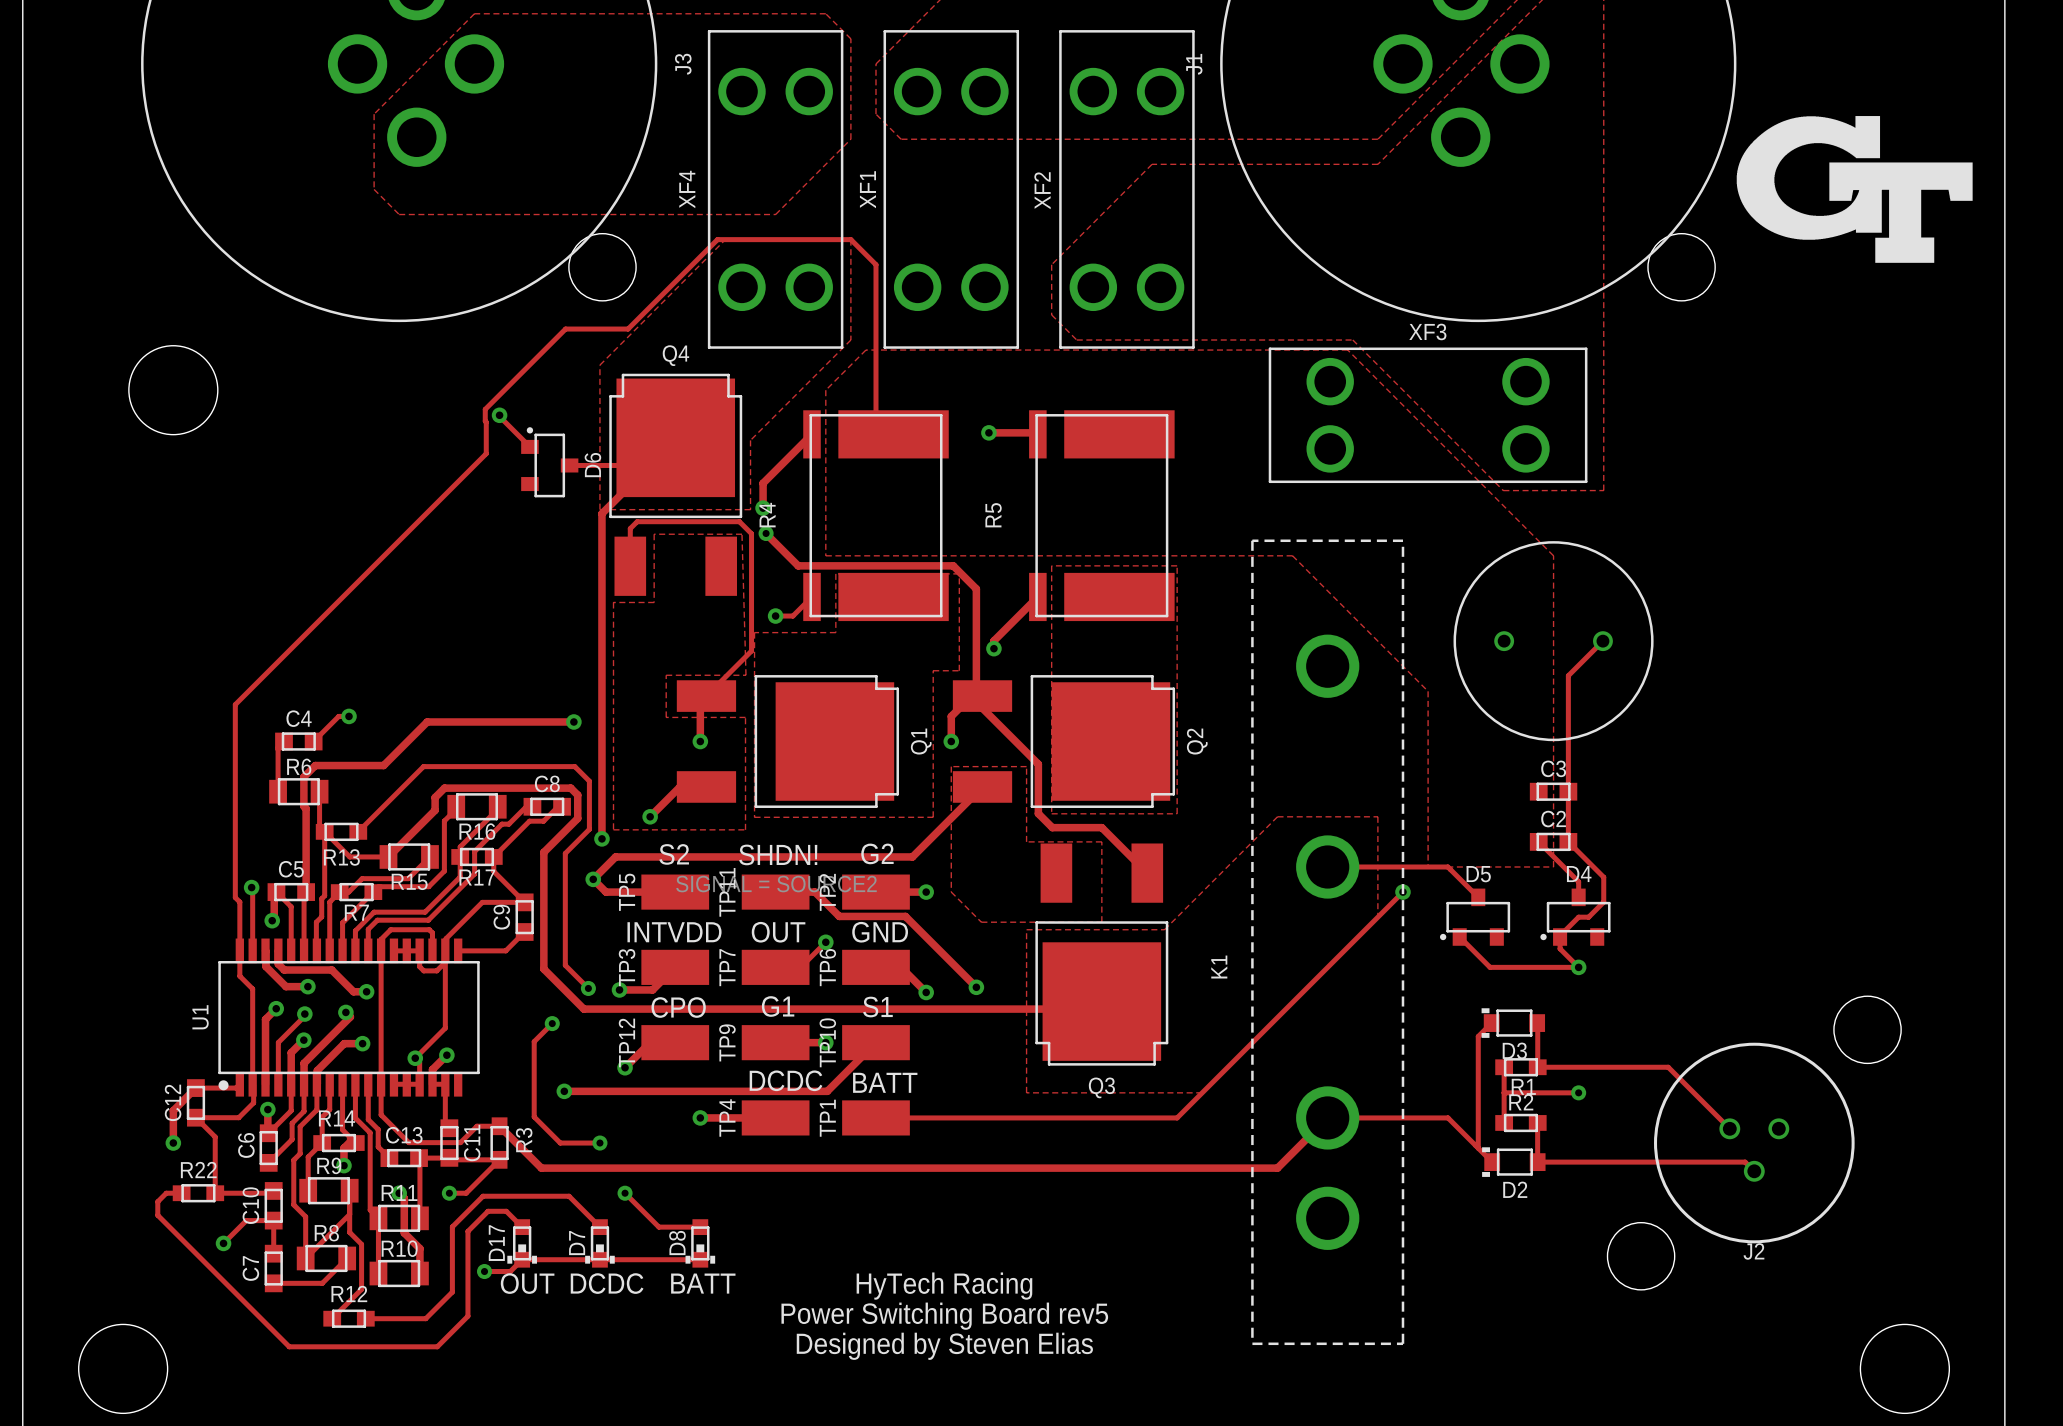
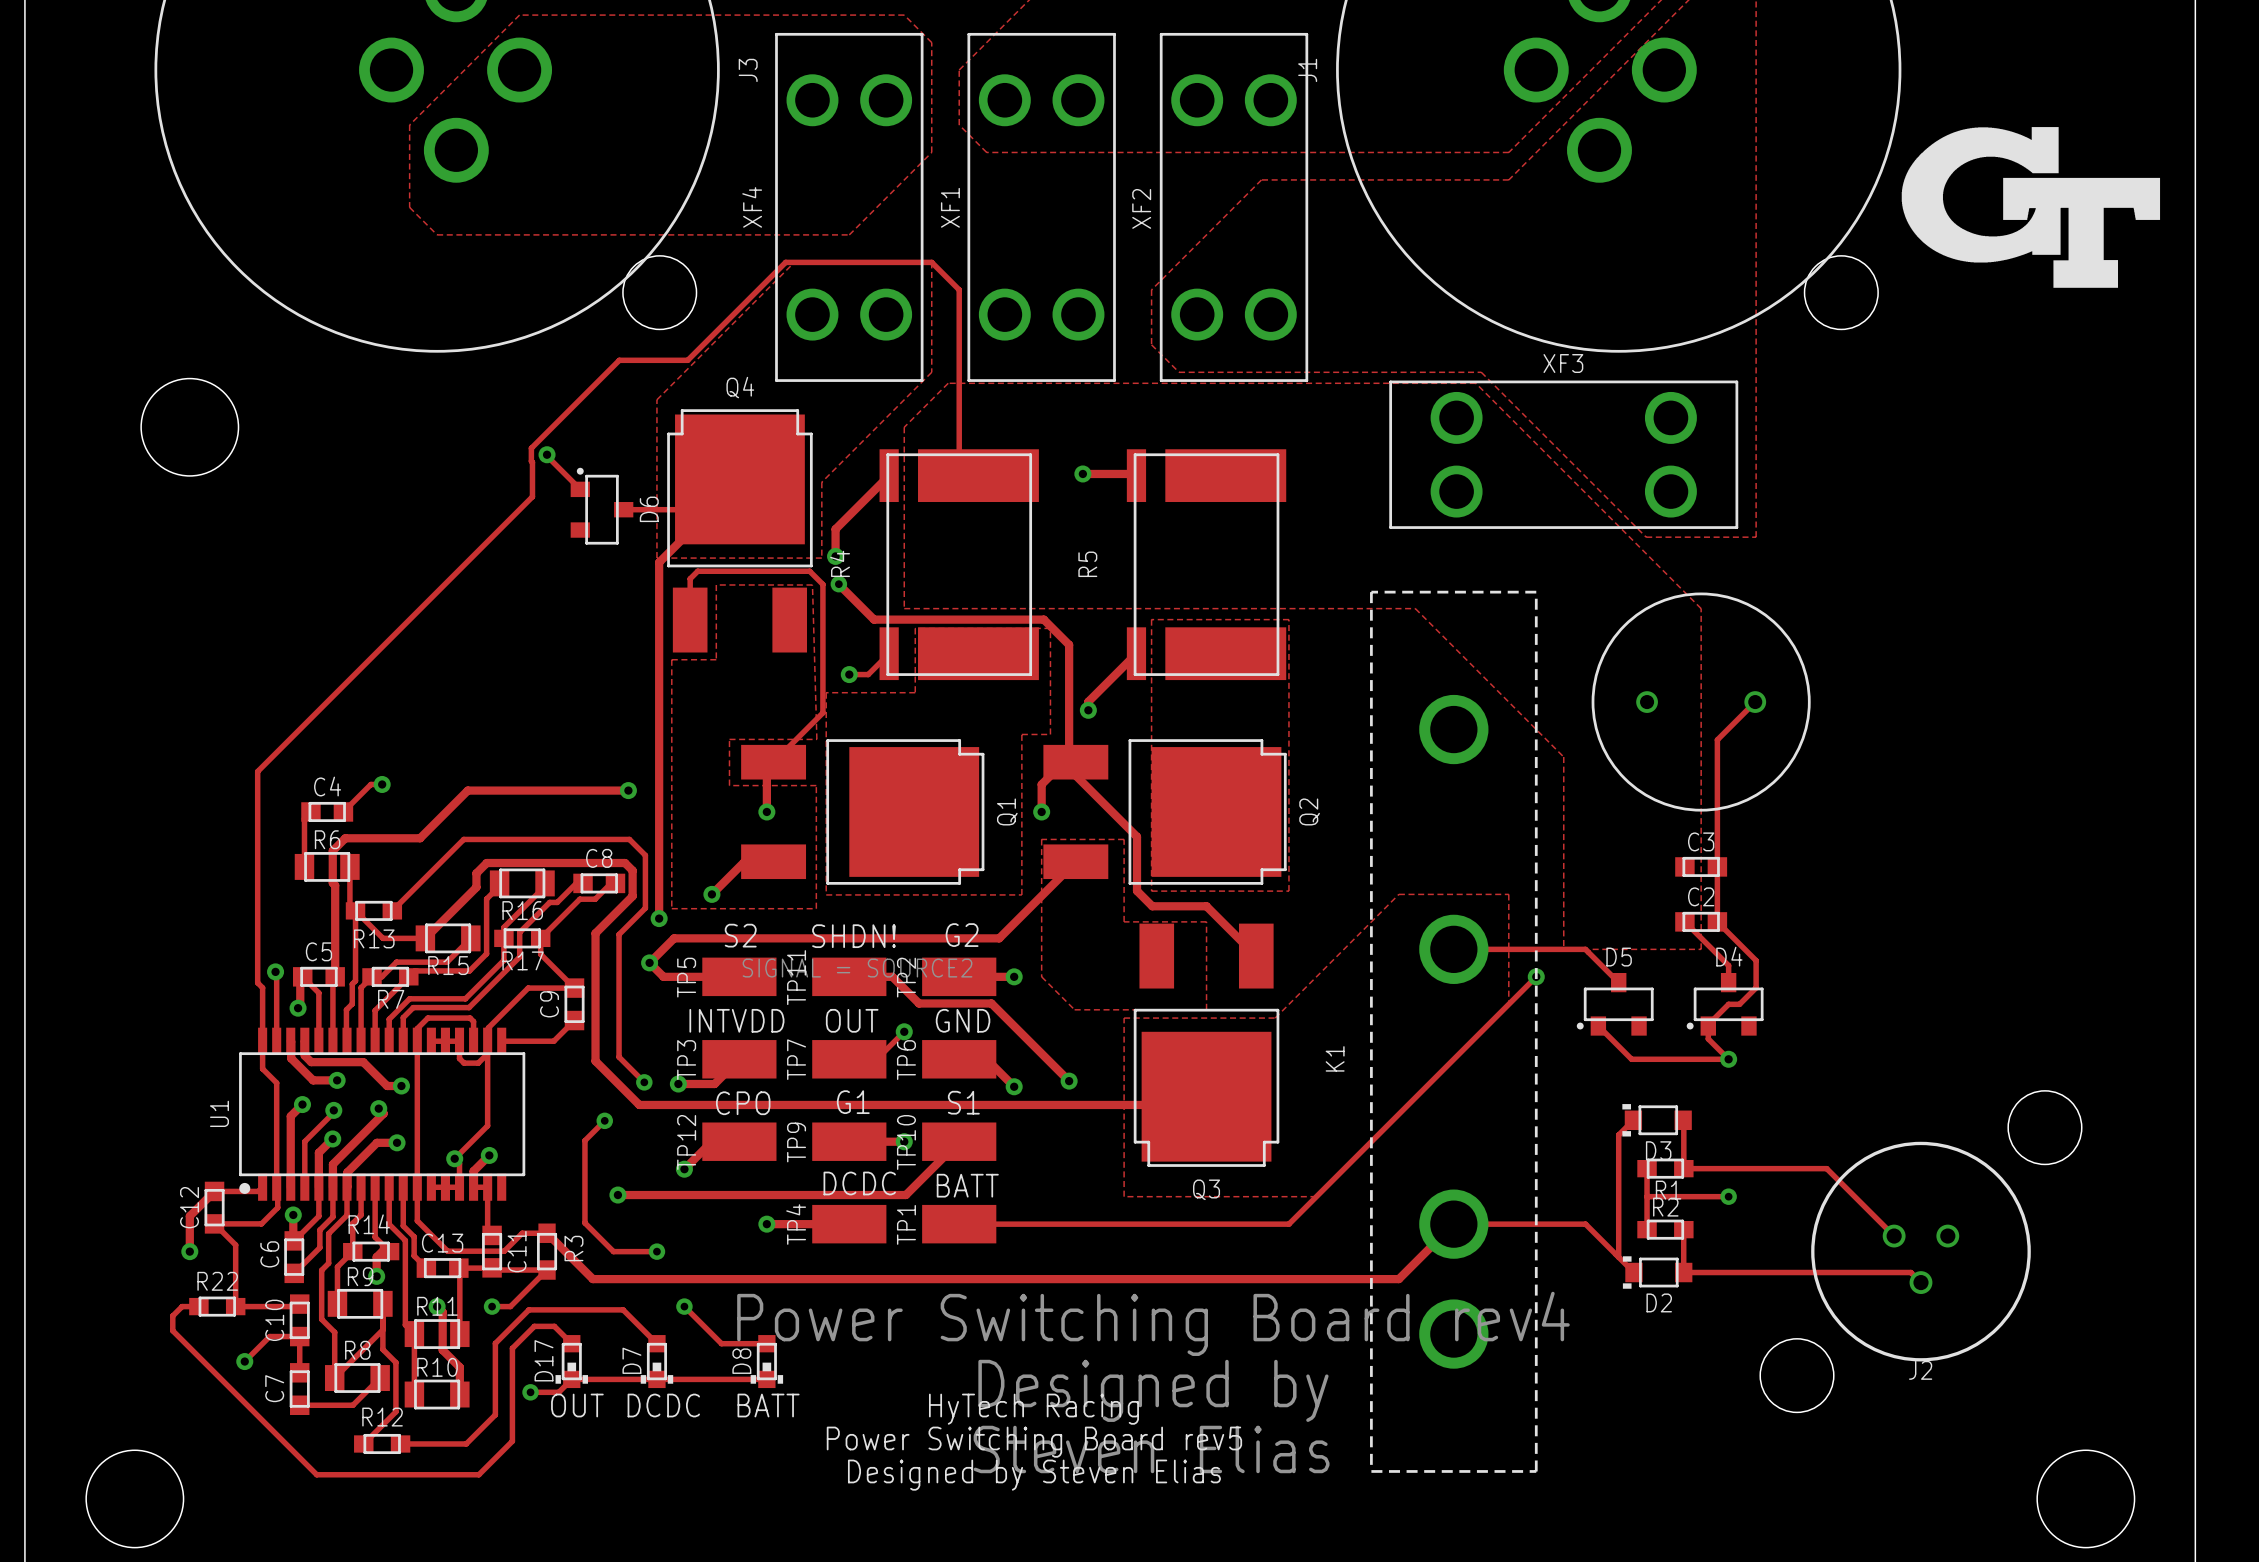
text: none -> Power Switching Board rev4 (1153, 1323)
text: none -> Designed by (1153, 1390)
text: none -> Steven Elias (1151, 1449)

